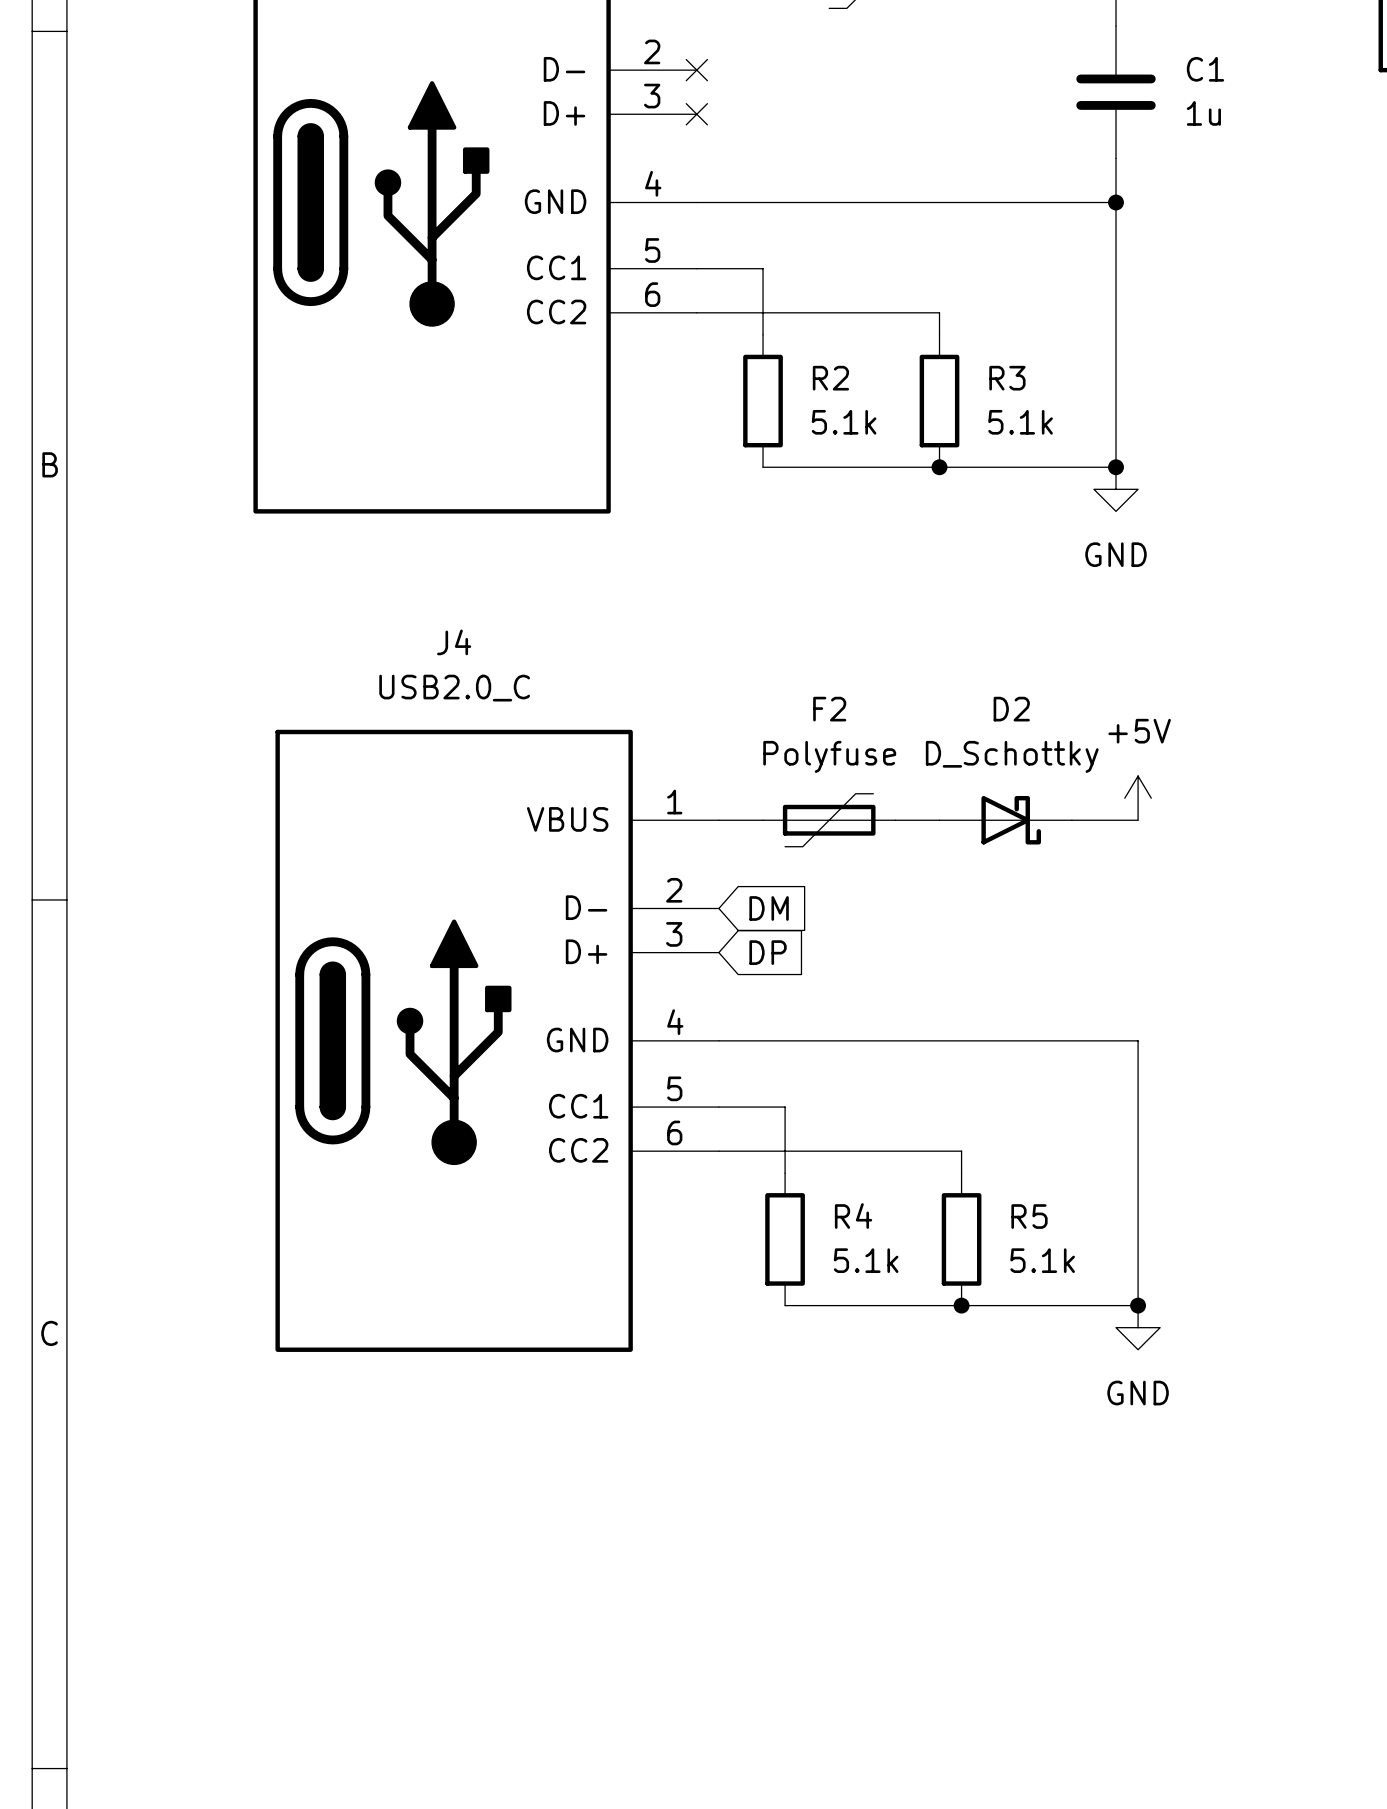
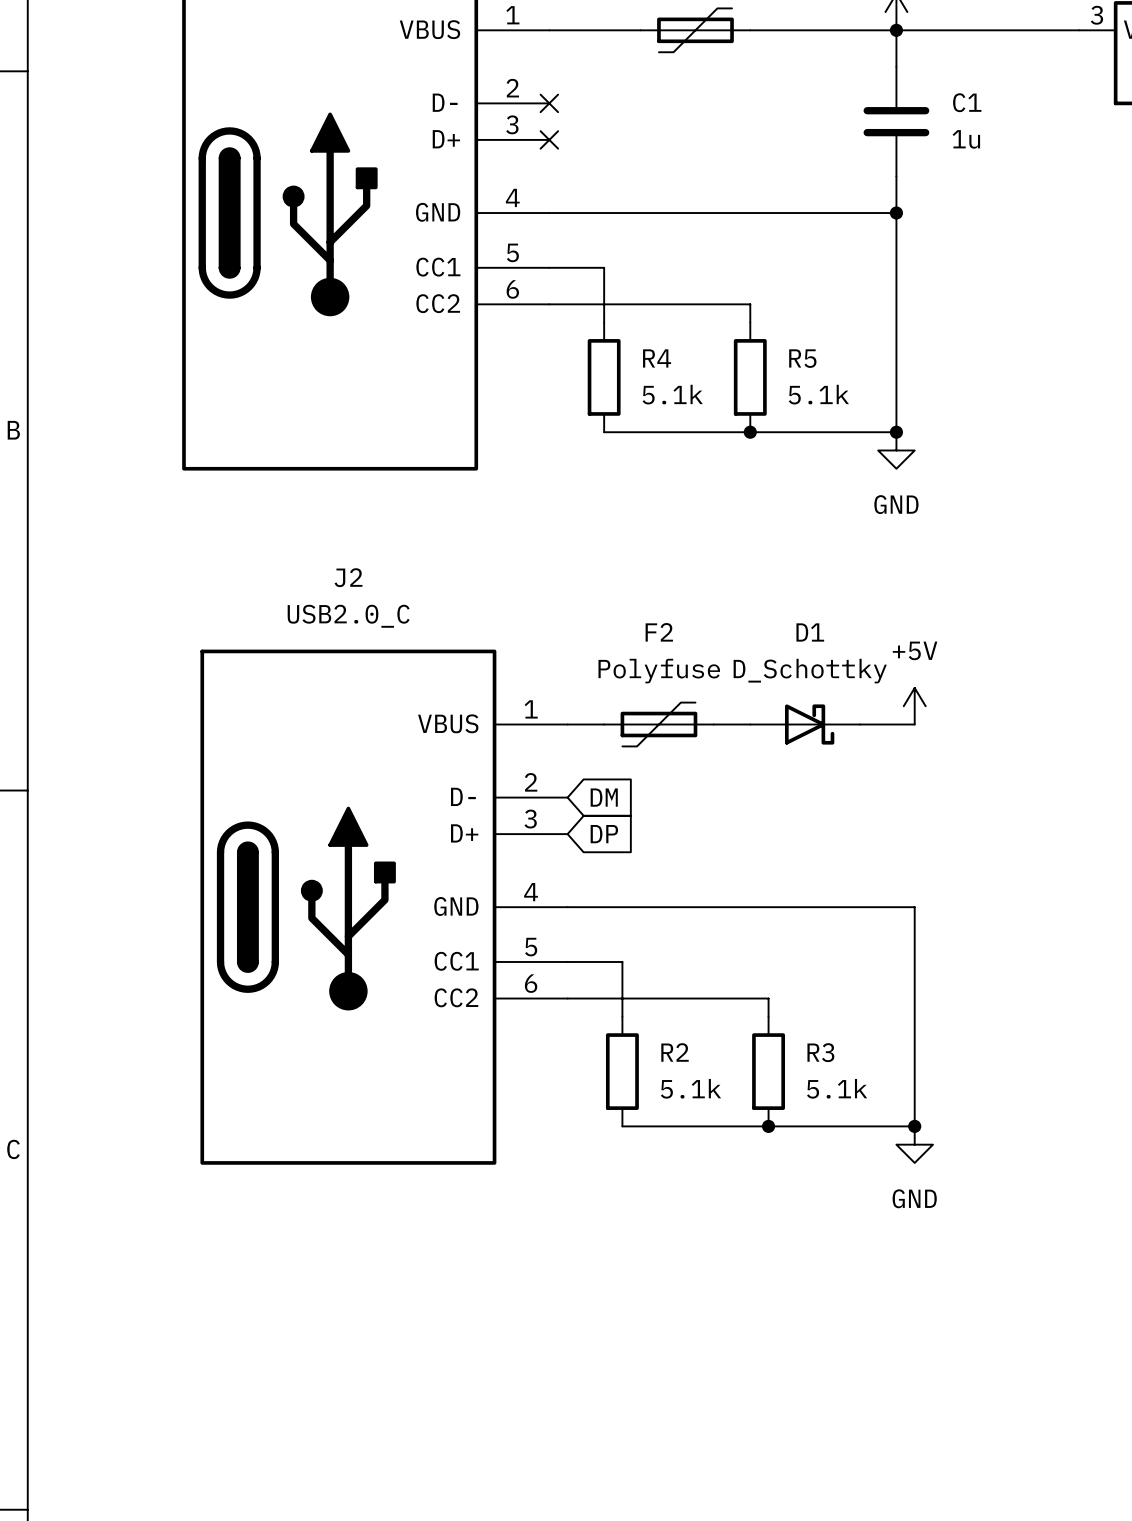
R2 name: R2 (830, 378) -> R4 (657, 358)
R3 name: R3 (1007, 378) -> R5 (802, 358)
J4 name: J4 (454, 642) -> J2 (348, 577)
D2 name: D2 (1011, 709) -> D1 (810, 632)
R4 name: R4 (853, 1216) -> R2 (675, 1052)
R5 name: R5 (1029, 1216) -> R3 (820, 1052)

